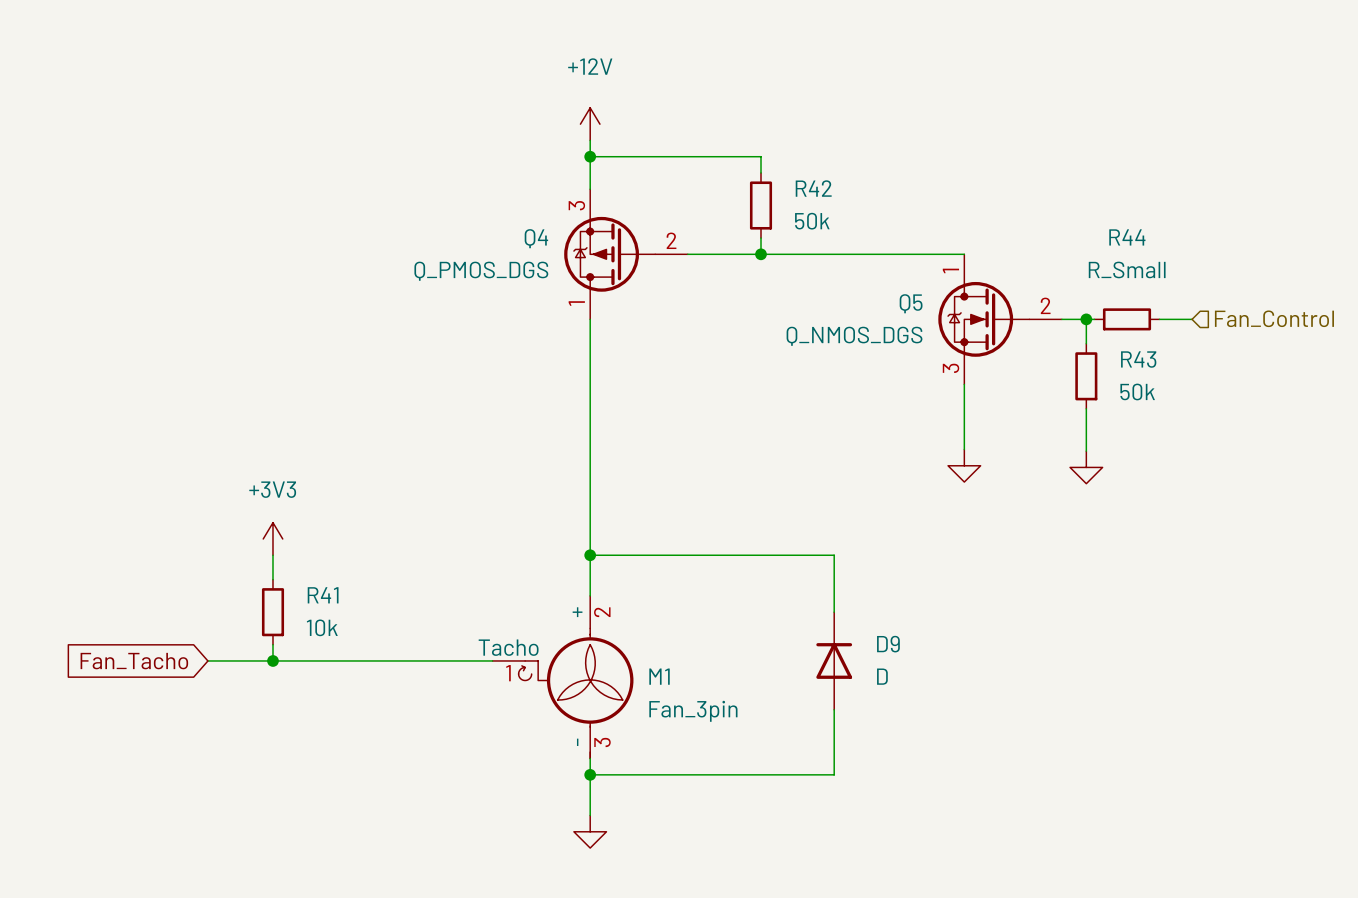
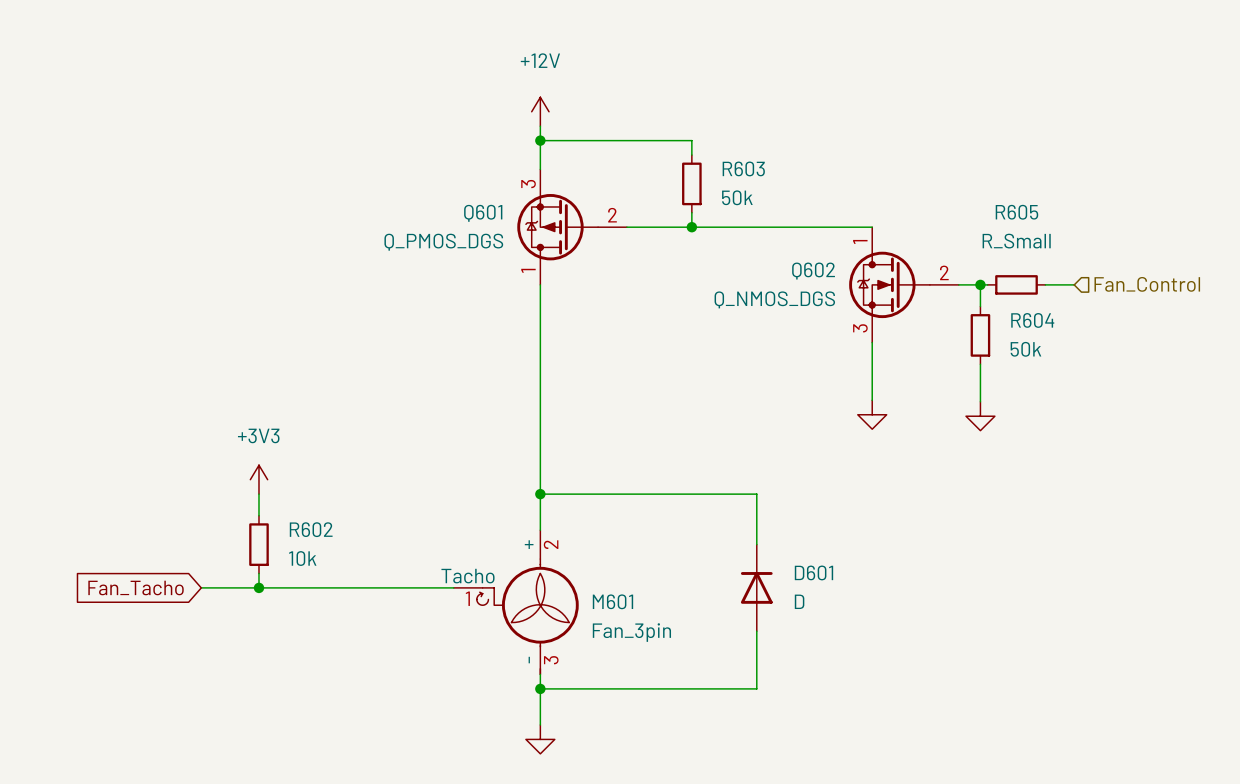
R42 name: R42 (813, 188) -> R603 (743, 168)
R44 name: R44 (1127, 237) -> R605 (1016, 212)
Q4 name: Q4 (536, 238) -> Q601 (483, 213)
Q5 name: Q5 (911, 303) -> Q602 (813, 271)
R43 name: R43 (1138, 359) -> R604 (1032, 320)
R41 name: R41 (323, 595) -> R602 (311, 529)
D9 name: D9 (888, 644) -> D601 (813, 572)
M1 name: M1 (659, 676) -> M601 (612, 601)

